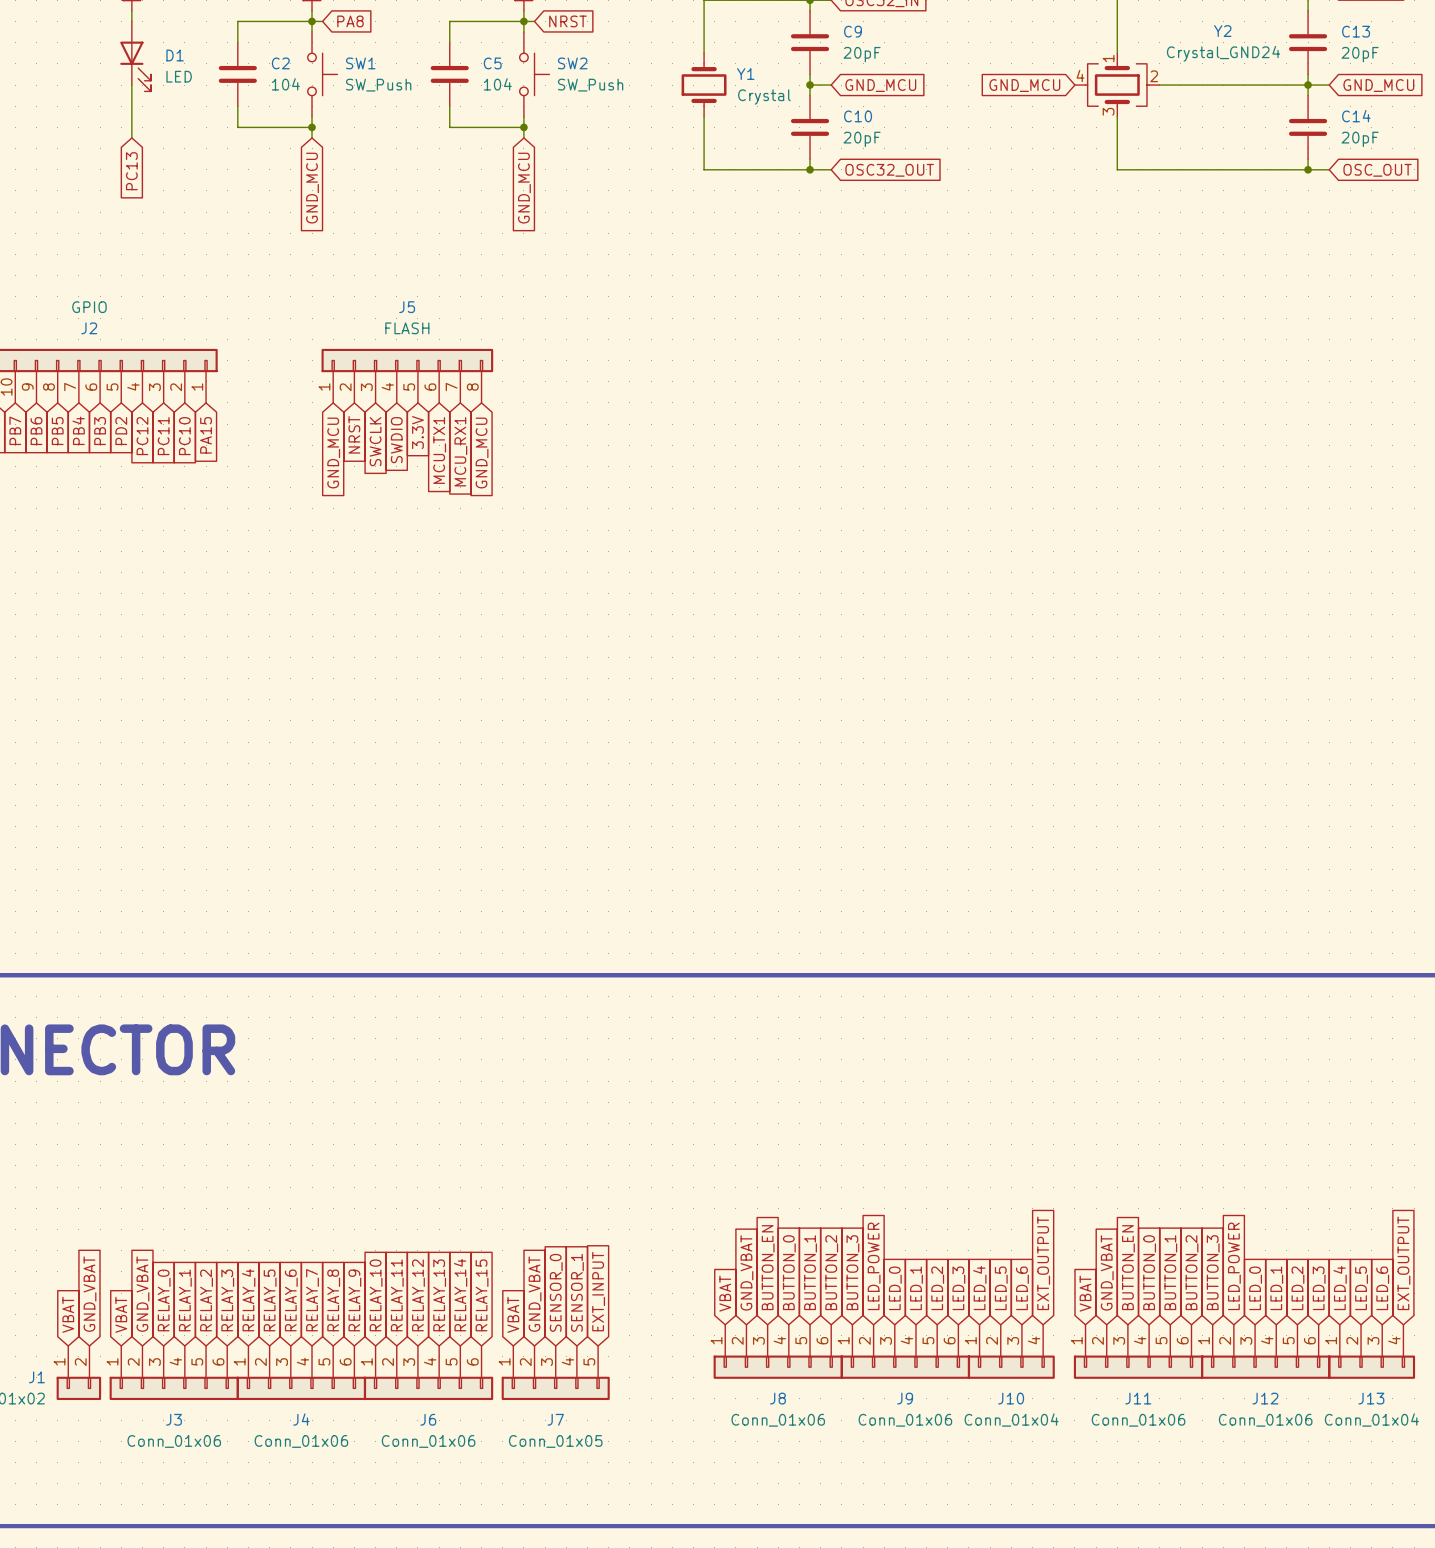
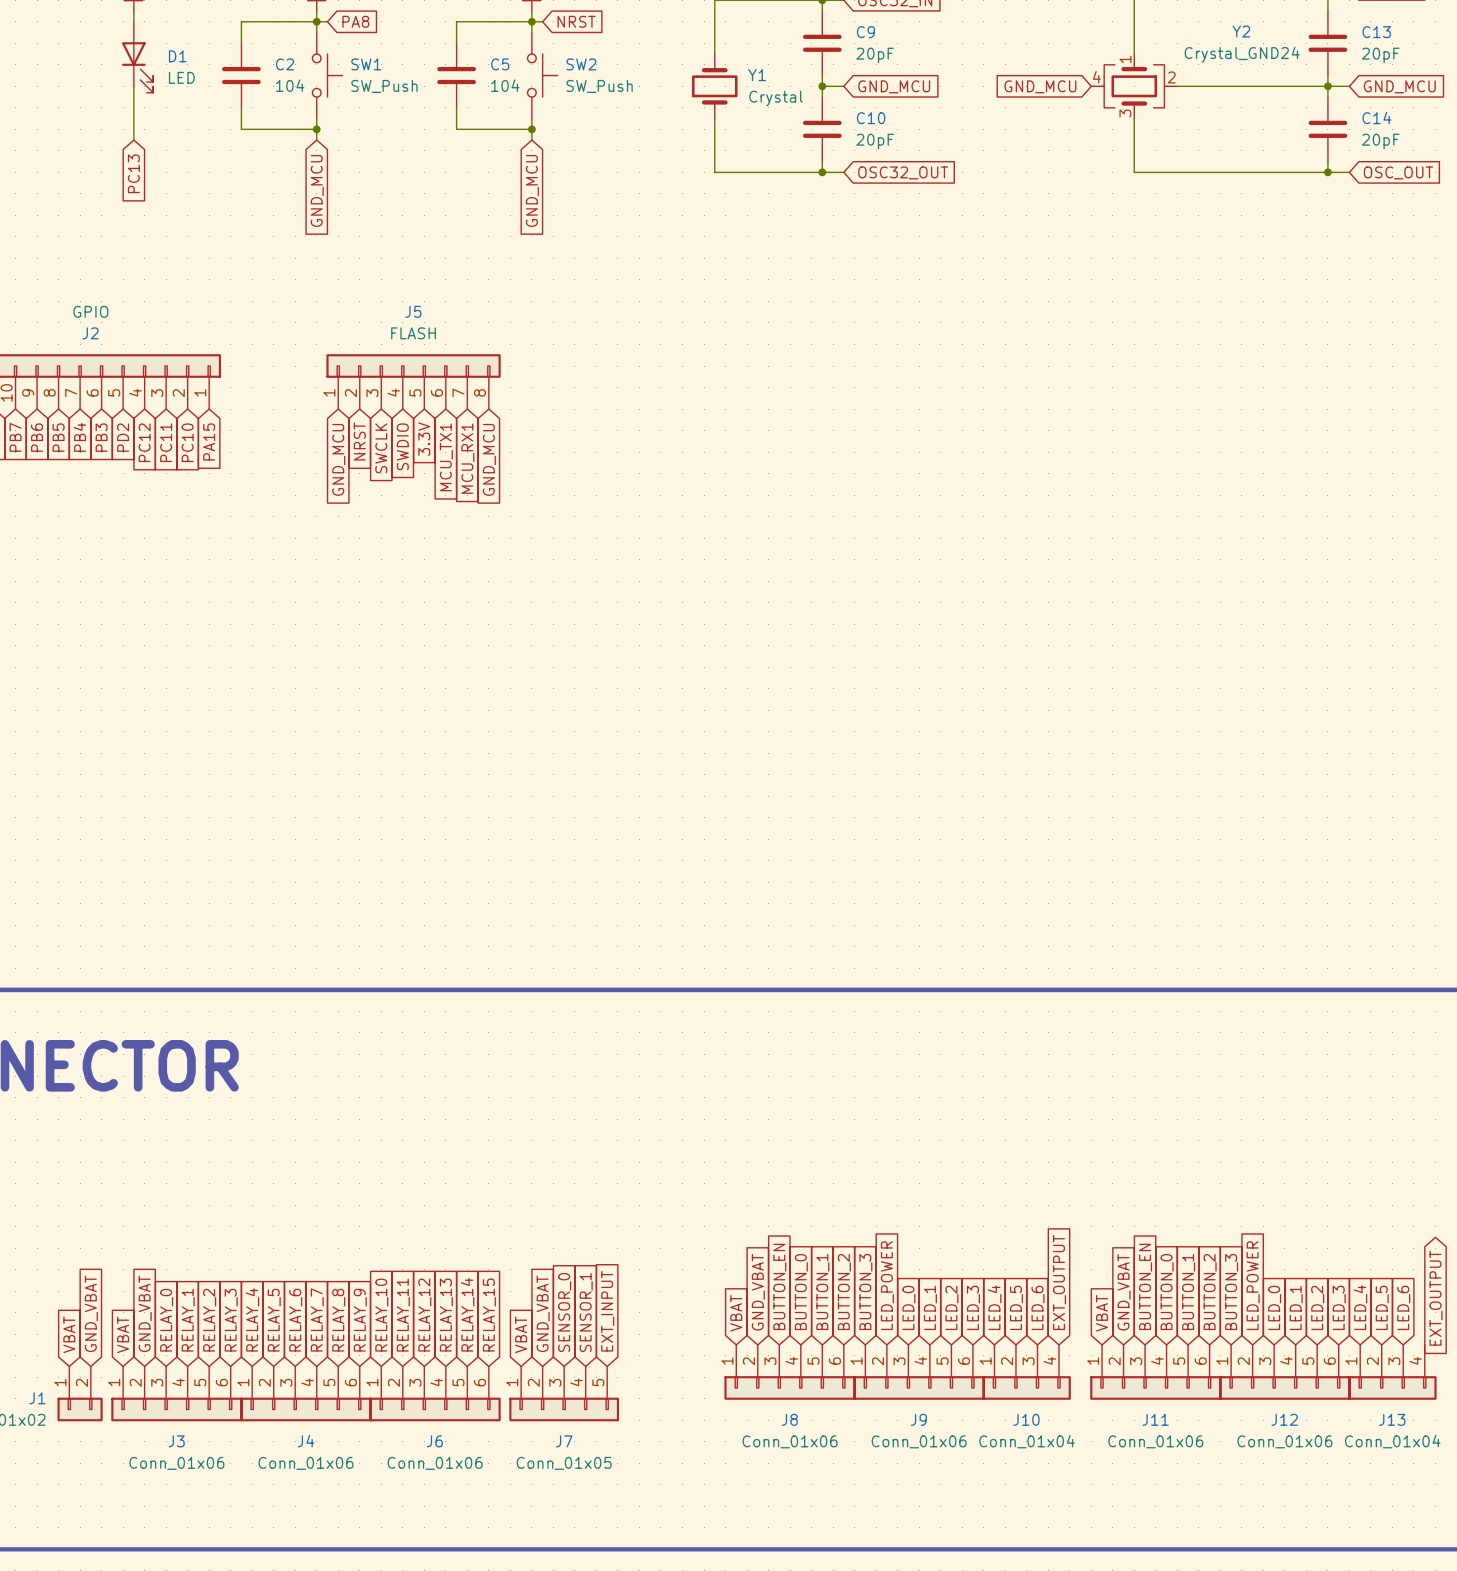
global label rotation: 0° (1403, 1263) -> 180° (1436, 1298)

